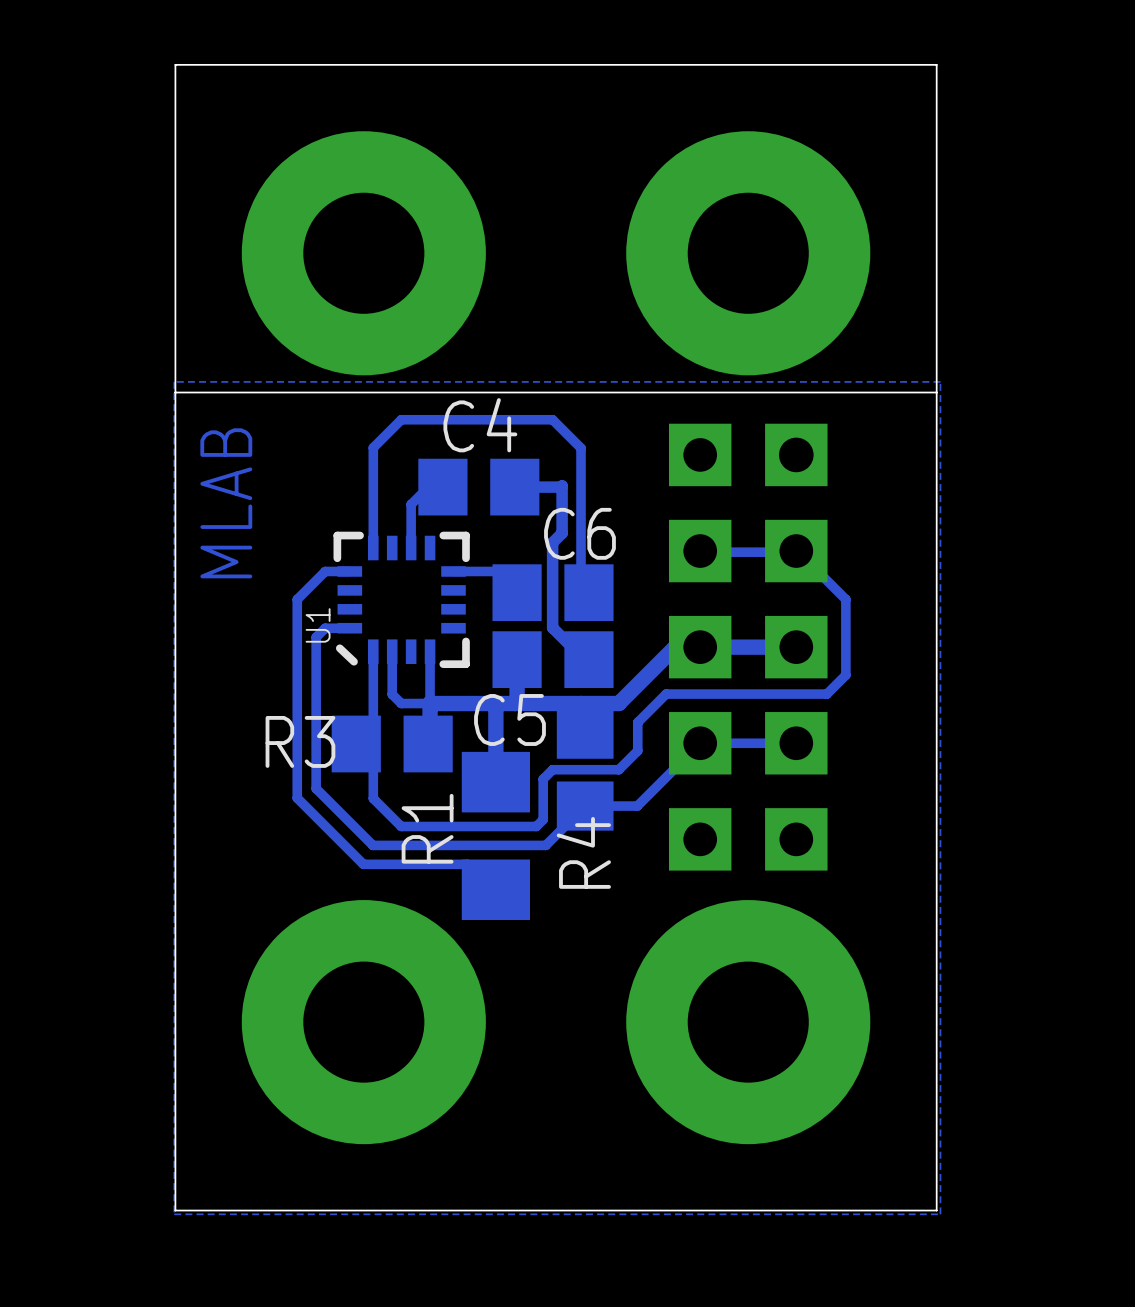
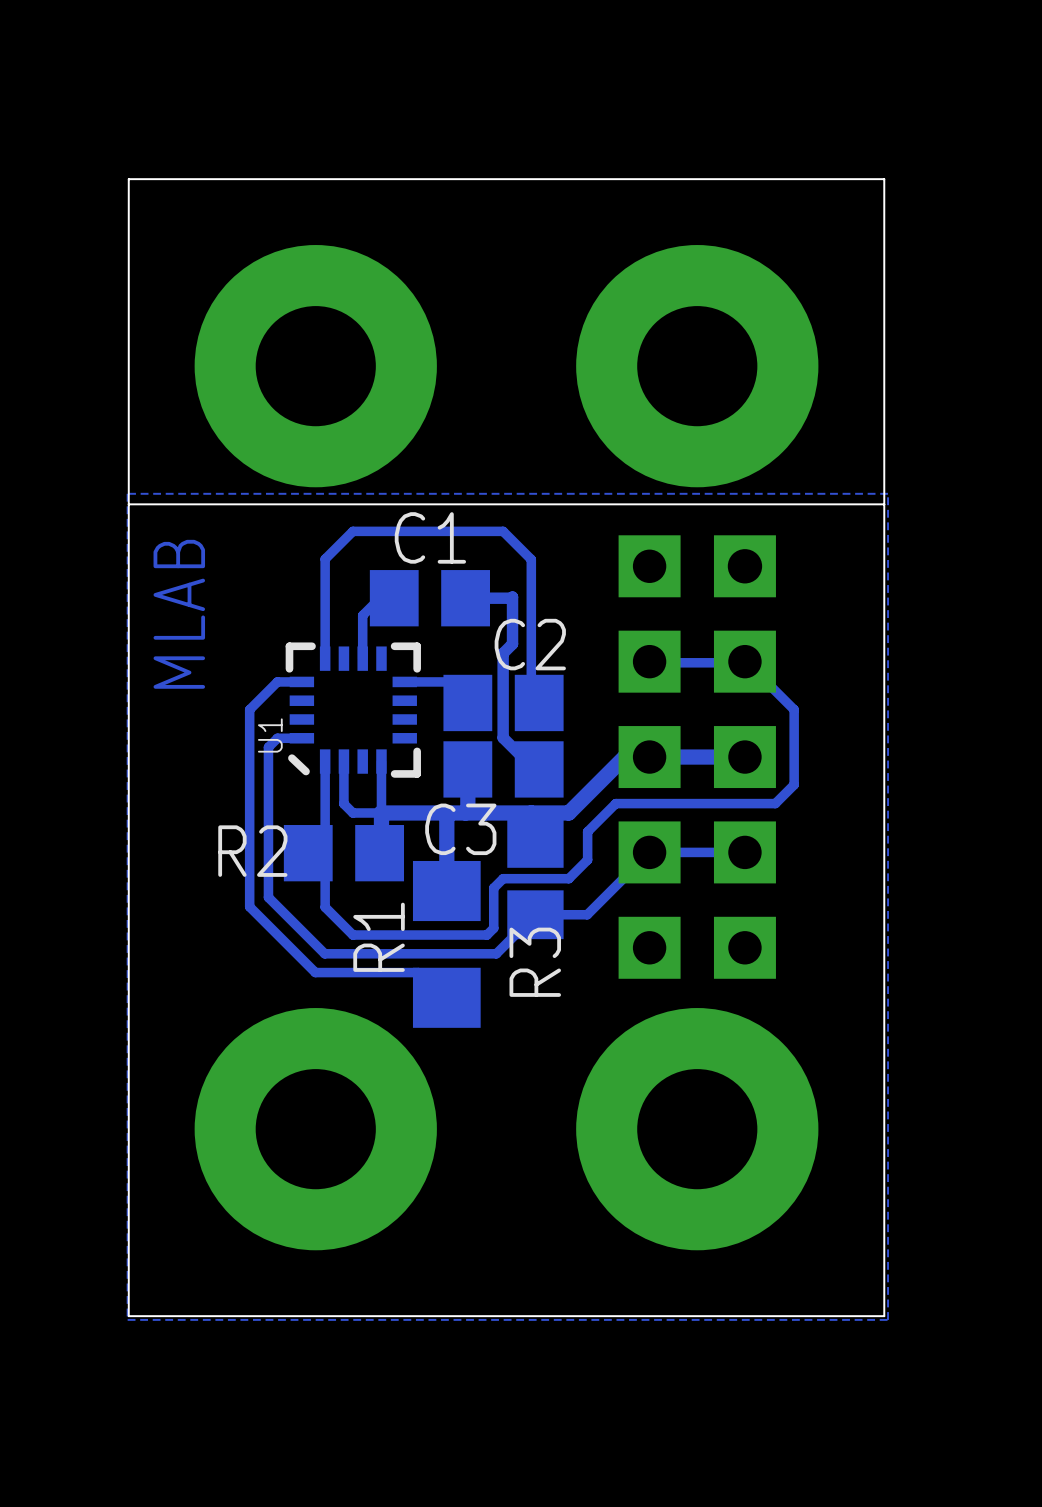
C4 name: C4 (480, 425) -> C1 (430, 537)
C6 name: C6 (579, 533) -> C2 (530, 644)
C5 name: C5 (509, 719) -> C3 (460, 829)
R3 name: R3 (300, 741) -> R2 (252, 851)
R4 name: R4 (583, 852) -> R3 (535, 962)

